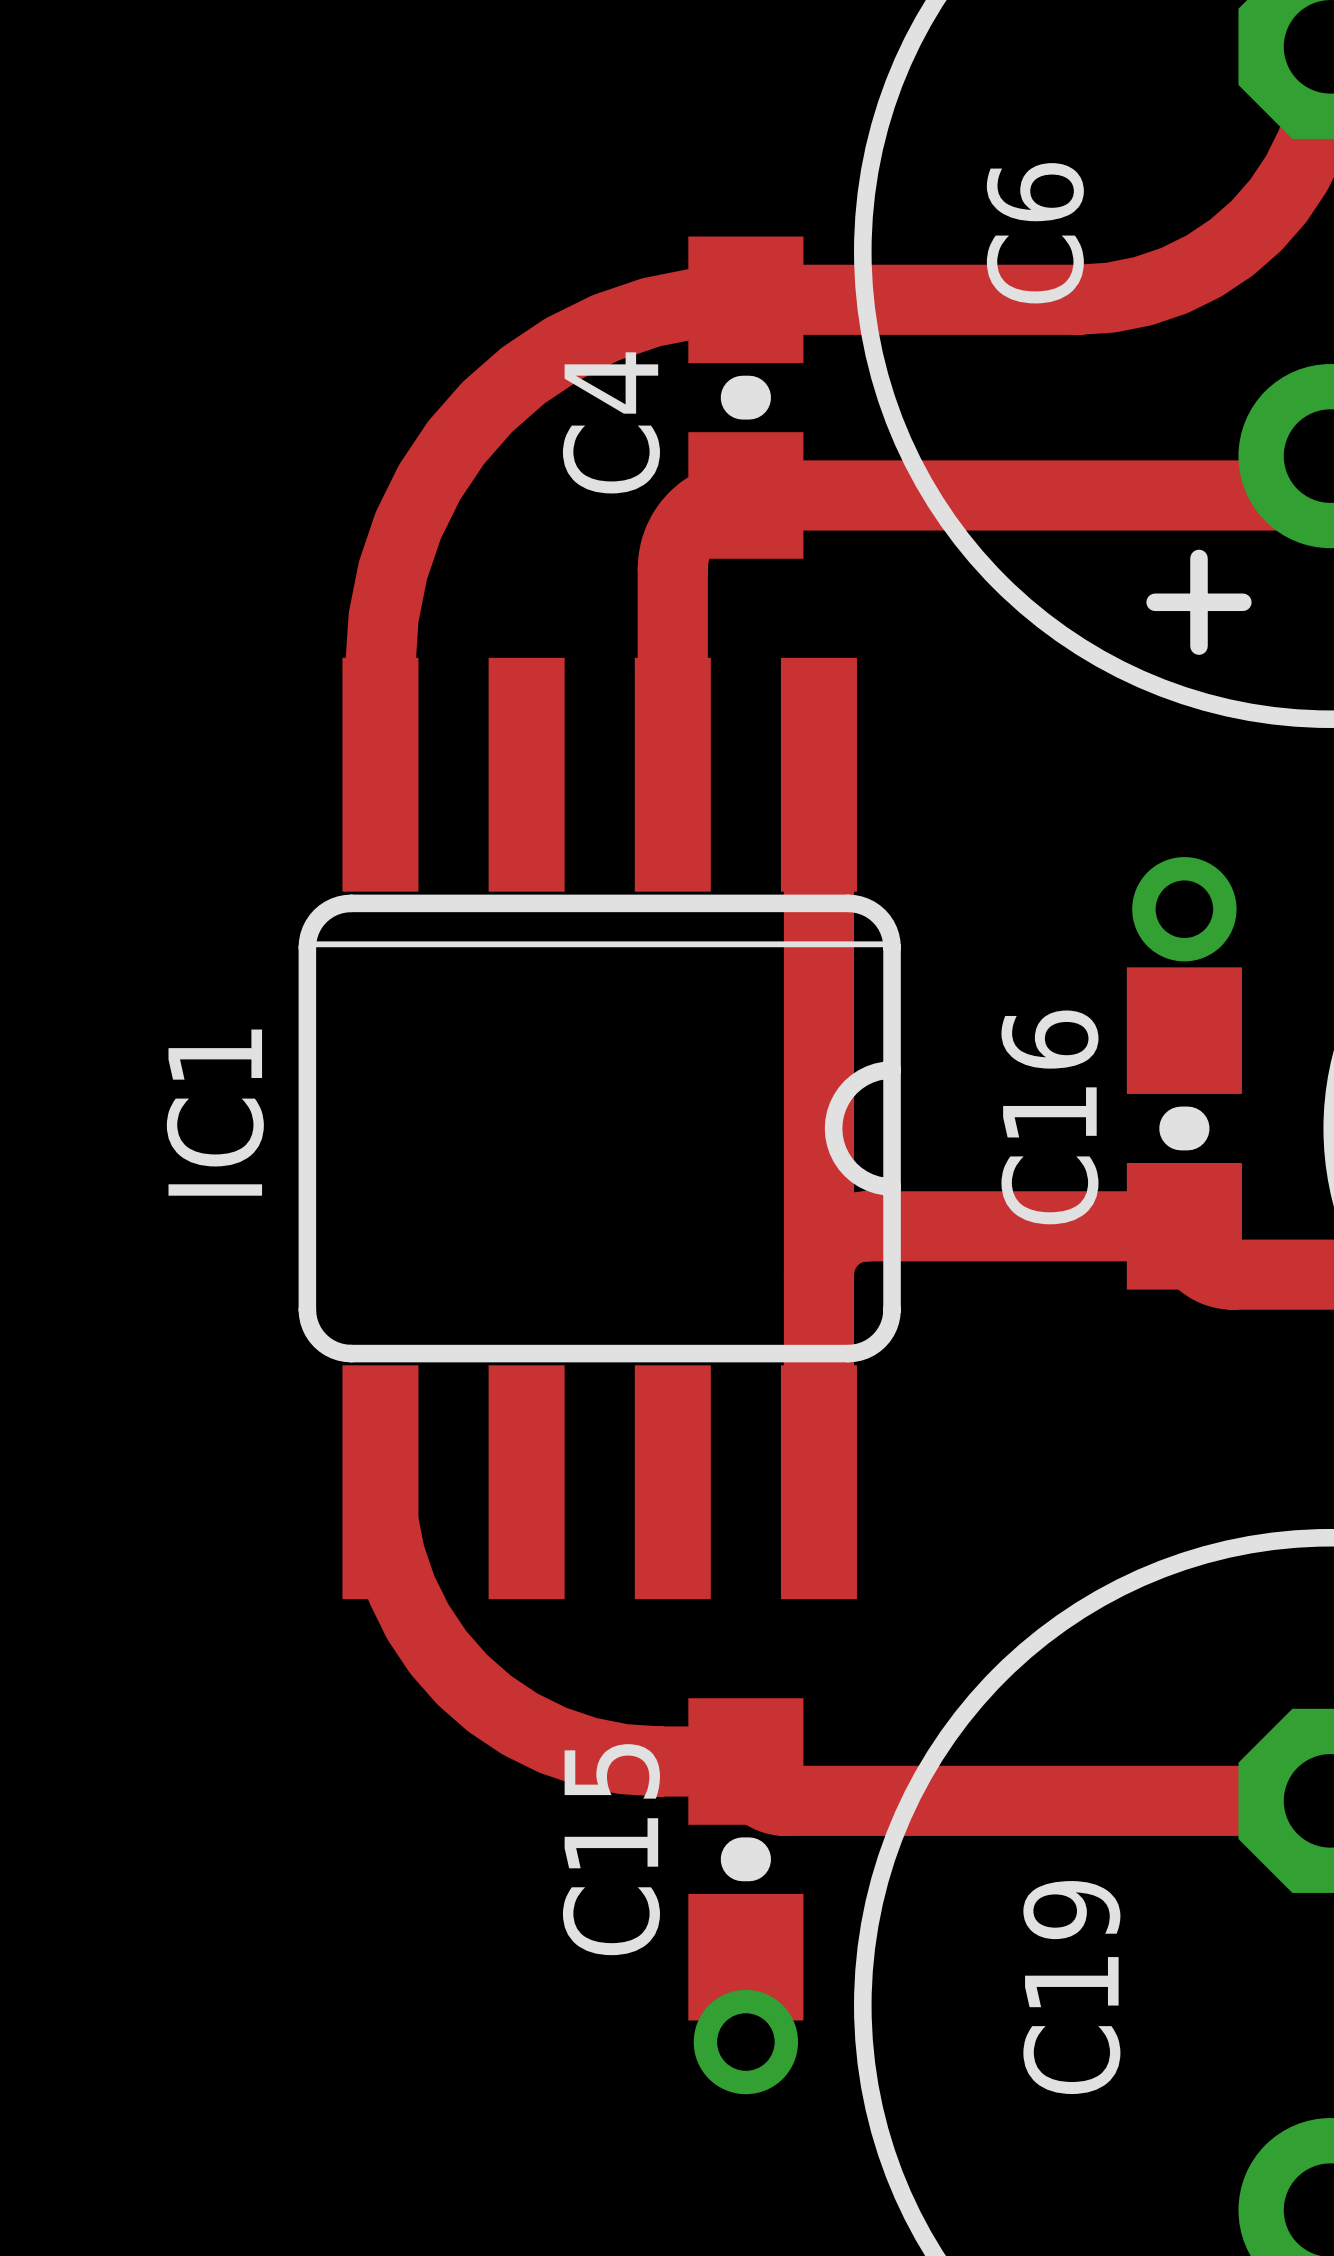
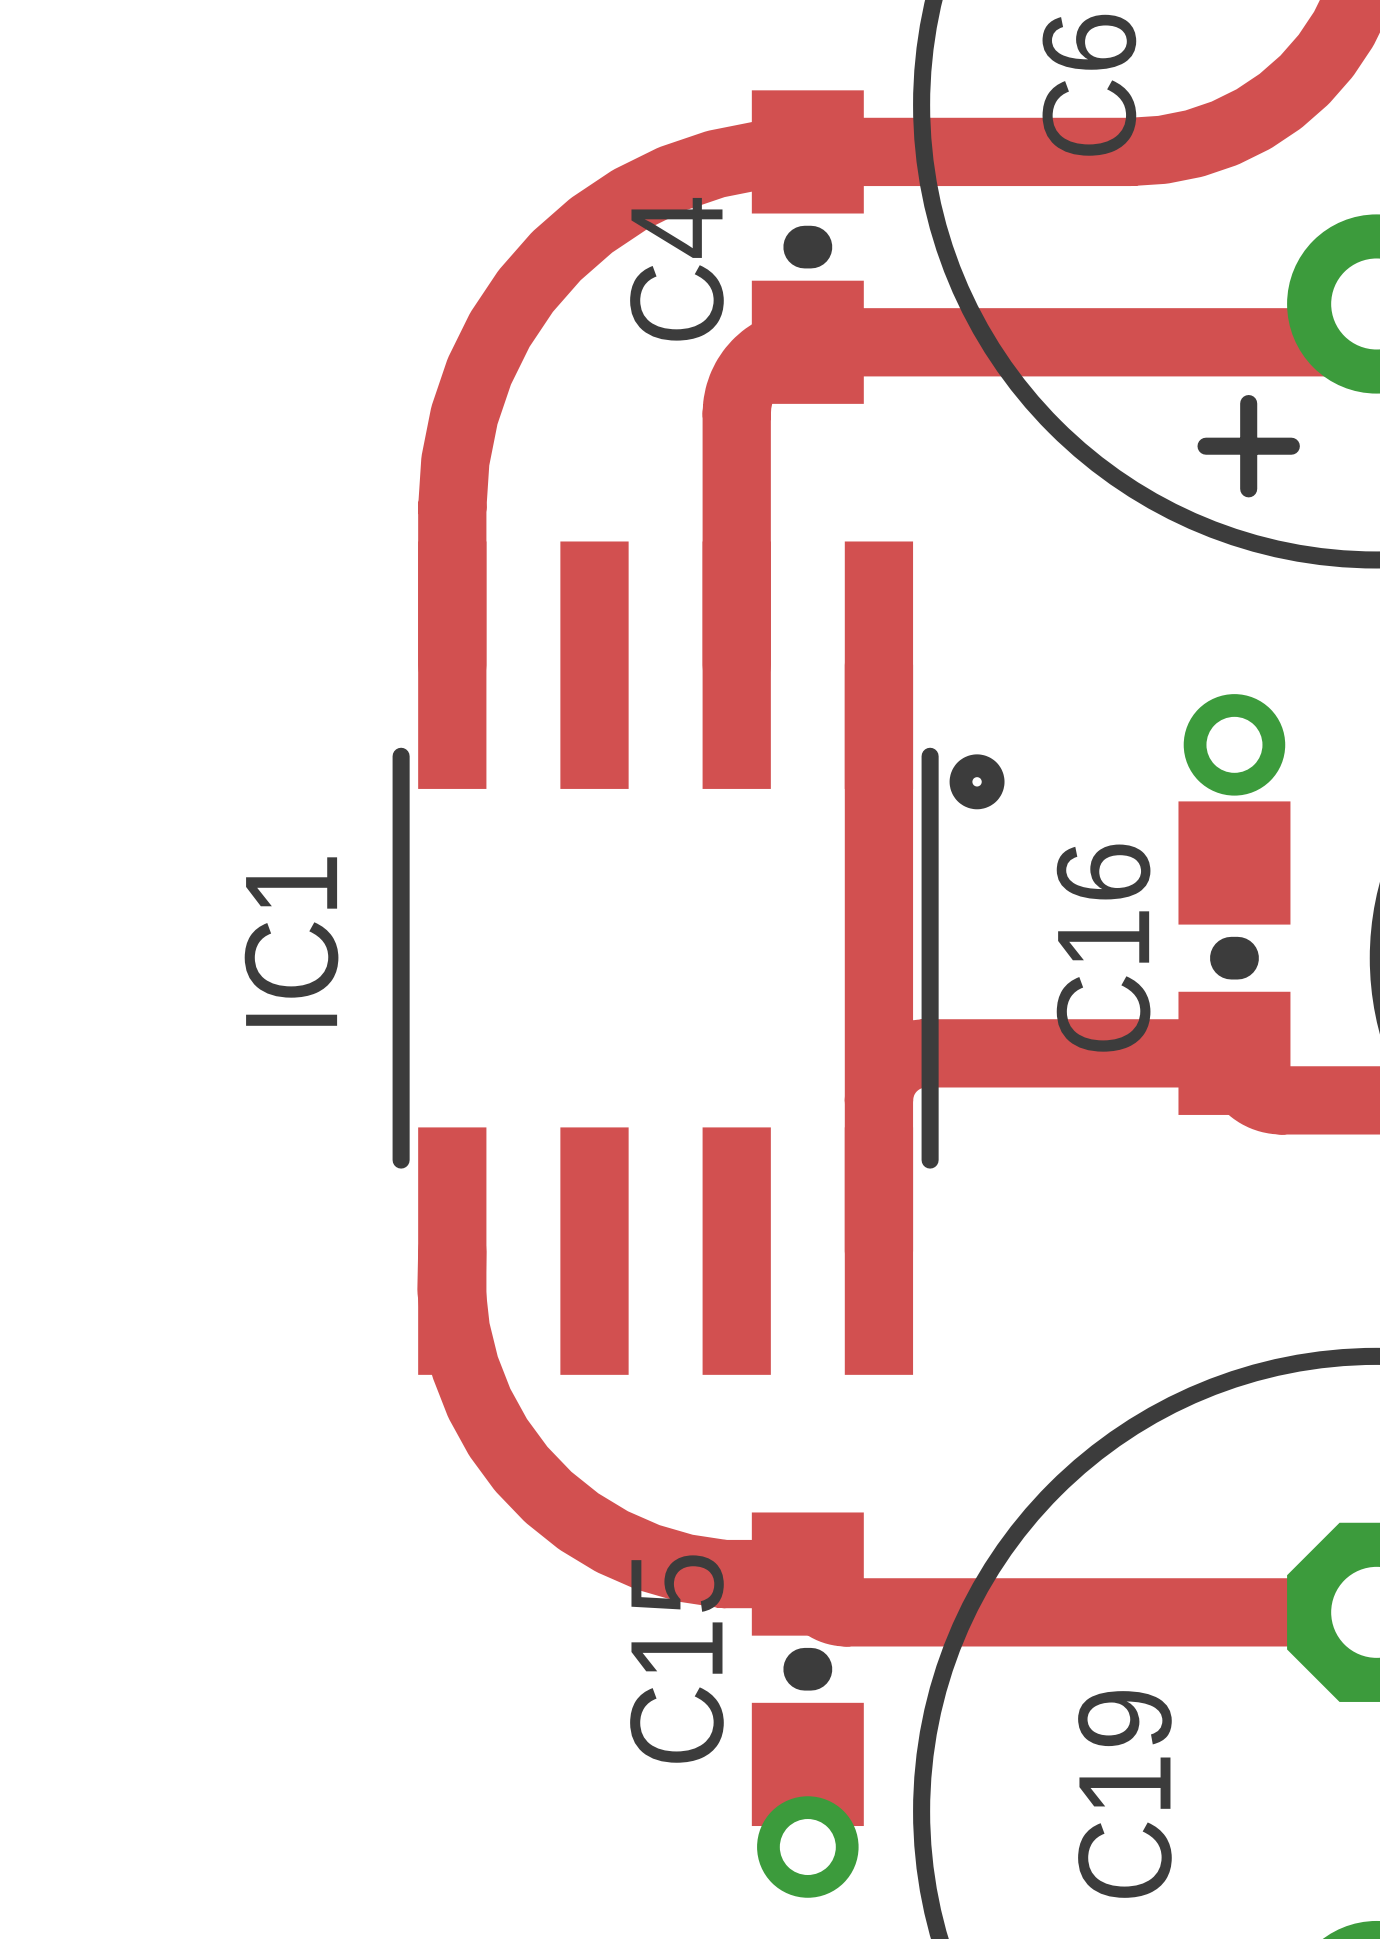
IC1 footprint: [298, 657, 901, 1600] -> [392, 541, 1005, 1375]
top track: (380, 1482) (382, 1518) (389, 1554) (401, 1589) (417, 1621) (438, 1652) (462, 1679) (489, 1703) (520, 1724) (552, 1740) (587, 1751) (623, 1759) (659, 1761) -> (452, 1251) (451, 1290) (455, 1328) (465, 1366) (479, 1403) (498, 1437) (521, 1468) (548, 1497) (578, 1521) (612, 1541) (647, 1557) (685, 1568) (724, 1574)

